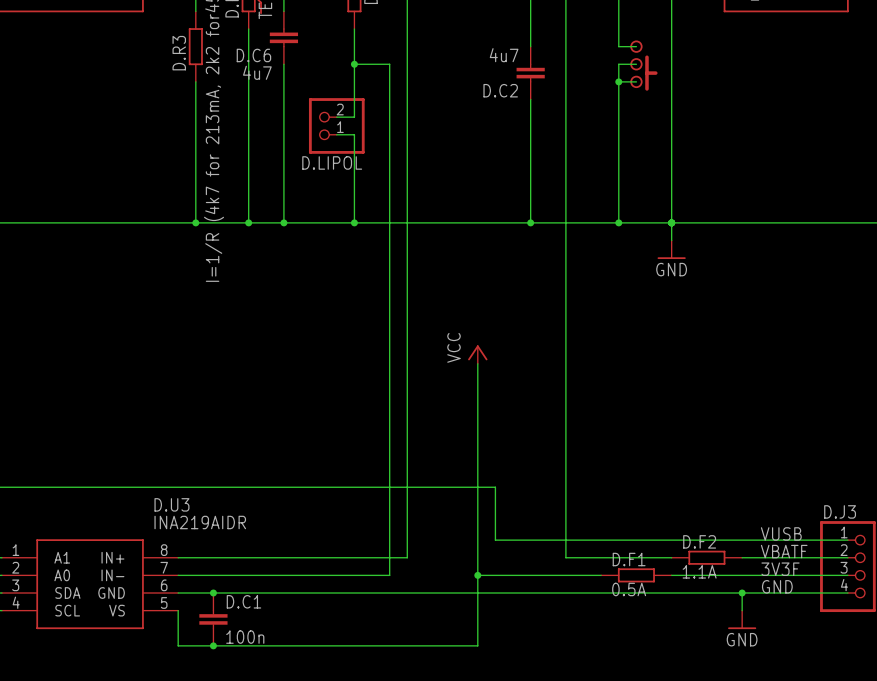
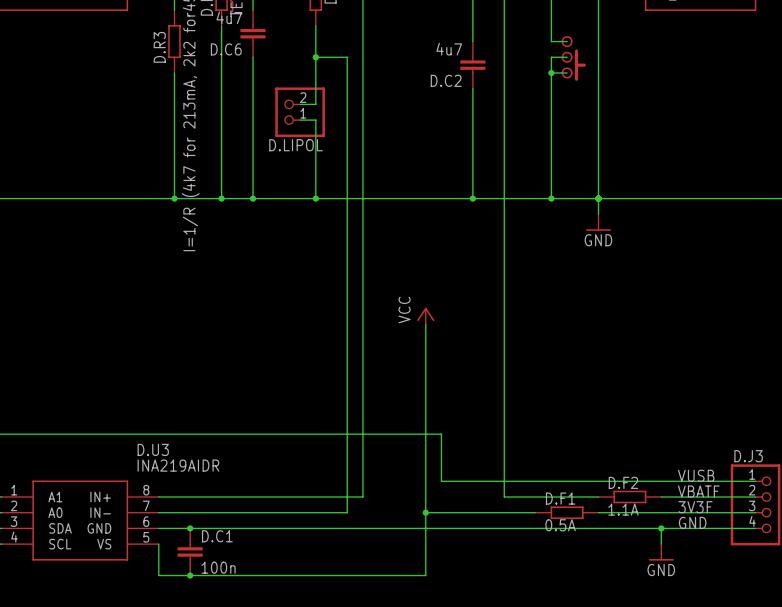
D.C6 value position: 4u7 (257, 72) -> 4u7 (229, 17)

